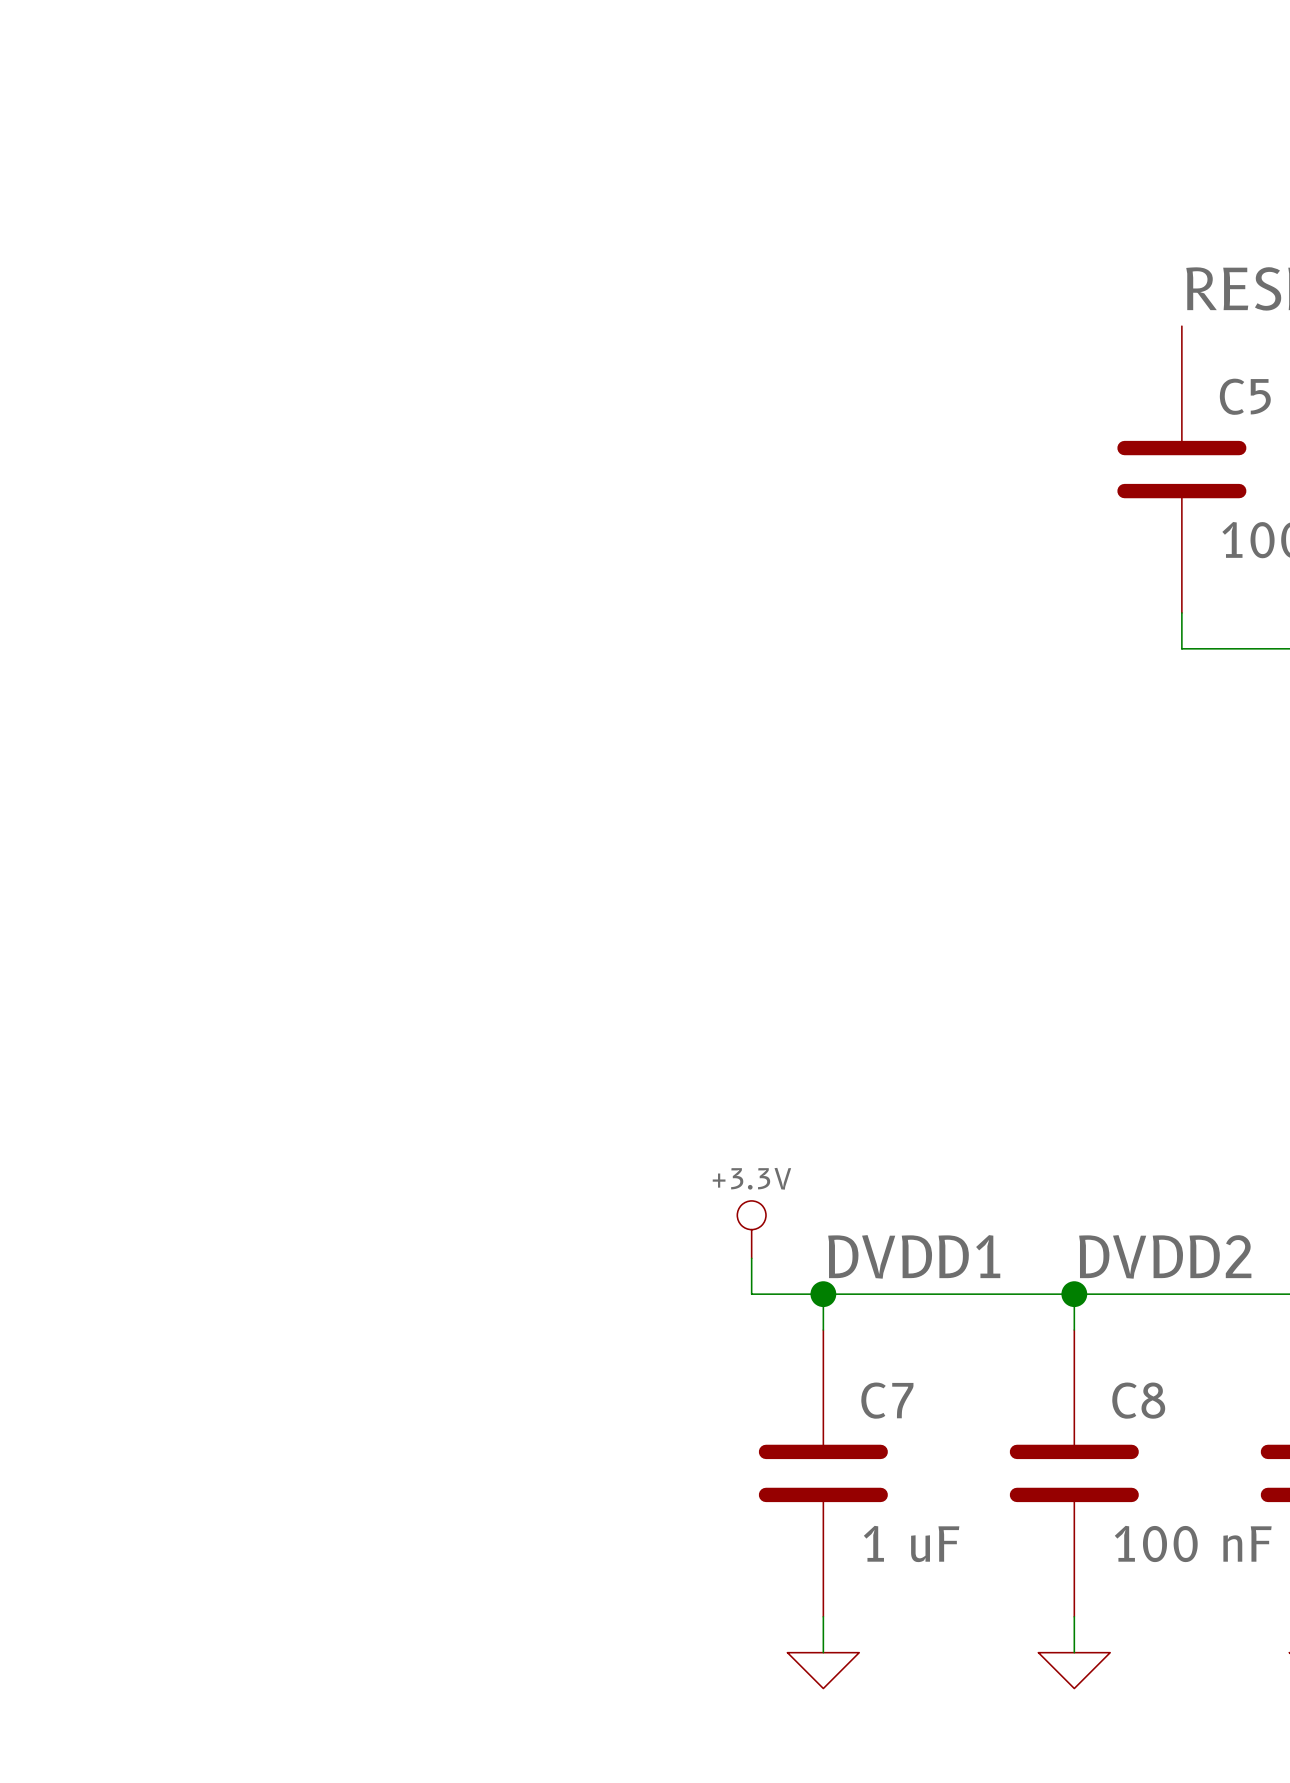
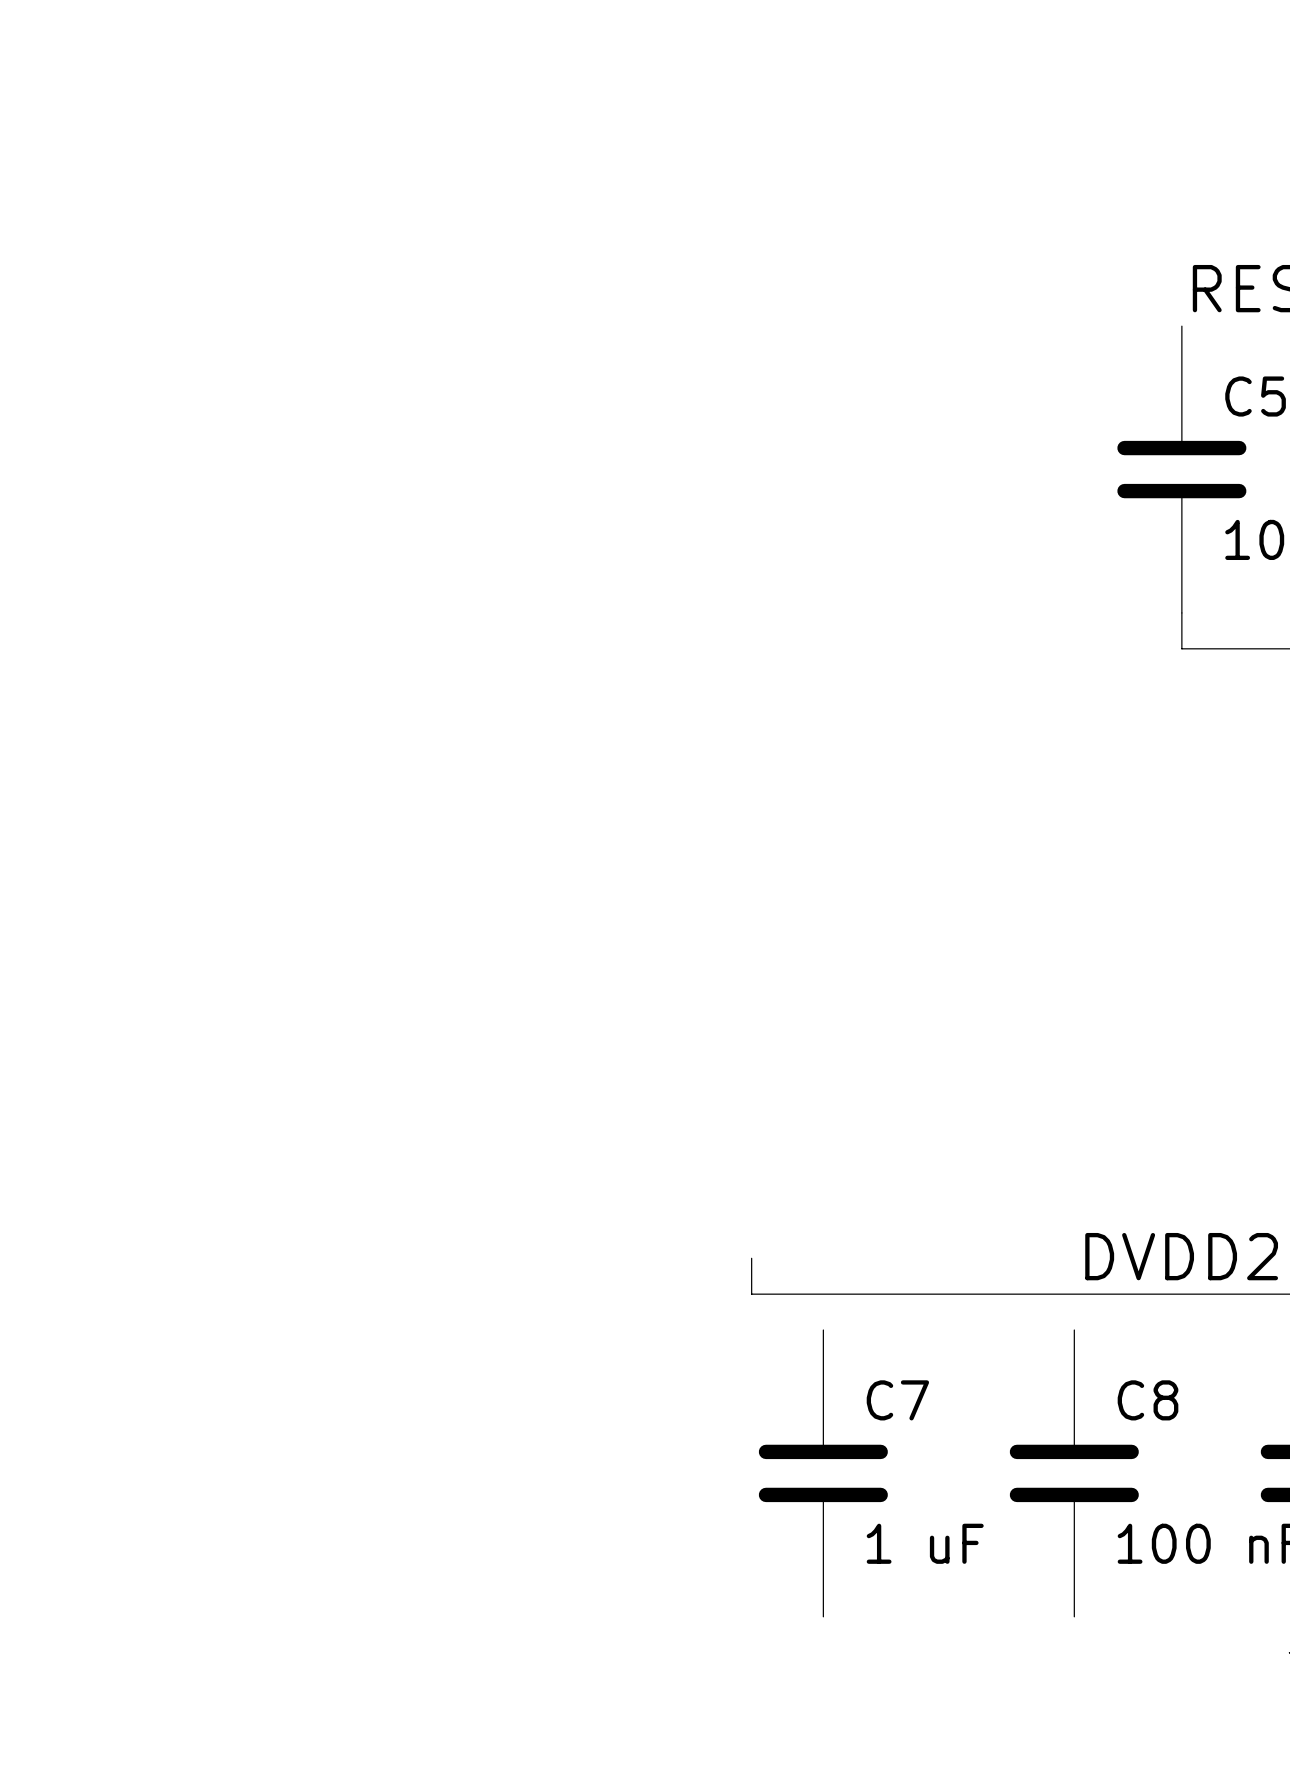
power symbol: +3.3V (751, 1229) -> none
label: DVDD1 (914, 1256) -> none
wire: (823, 1294) (823, 1330) -> none
junction: (823, 1294) -> none
wire: (1074, 1294) (1074, 1330) -> none
junction: (1074, 1294) -> none
wire: (823, 1616) (823, 1652) -> none
wire: (1074, 1616) (1074, 1652) -> none
power symbol: (823, 1670) -> none
power symbol: (1074, 1670) -> none

